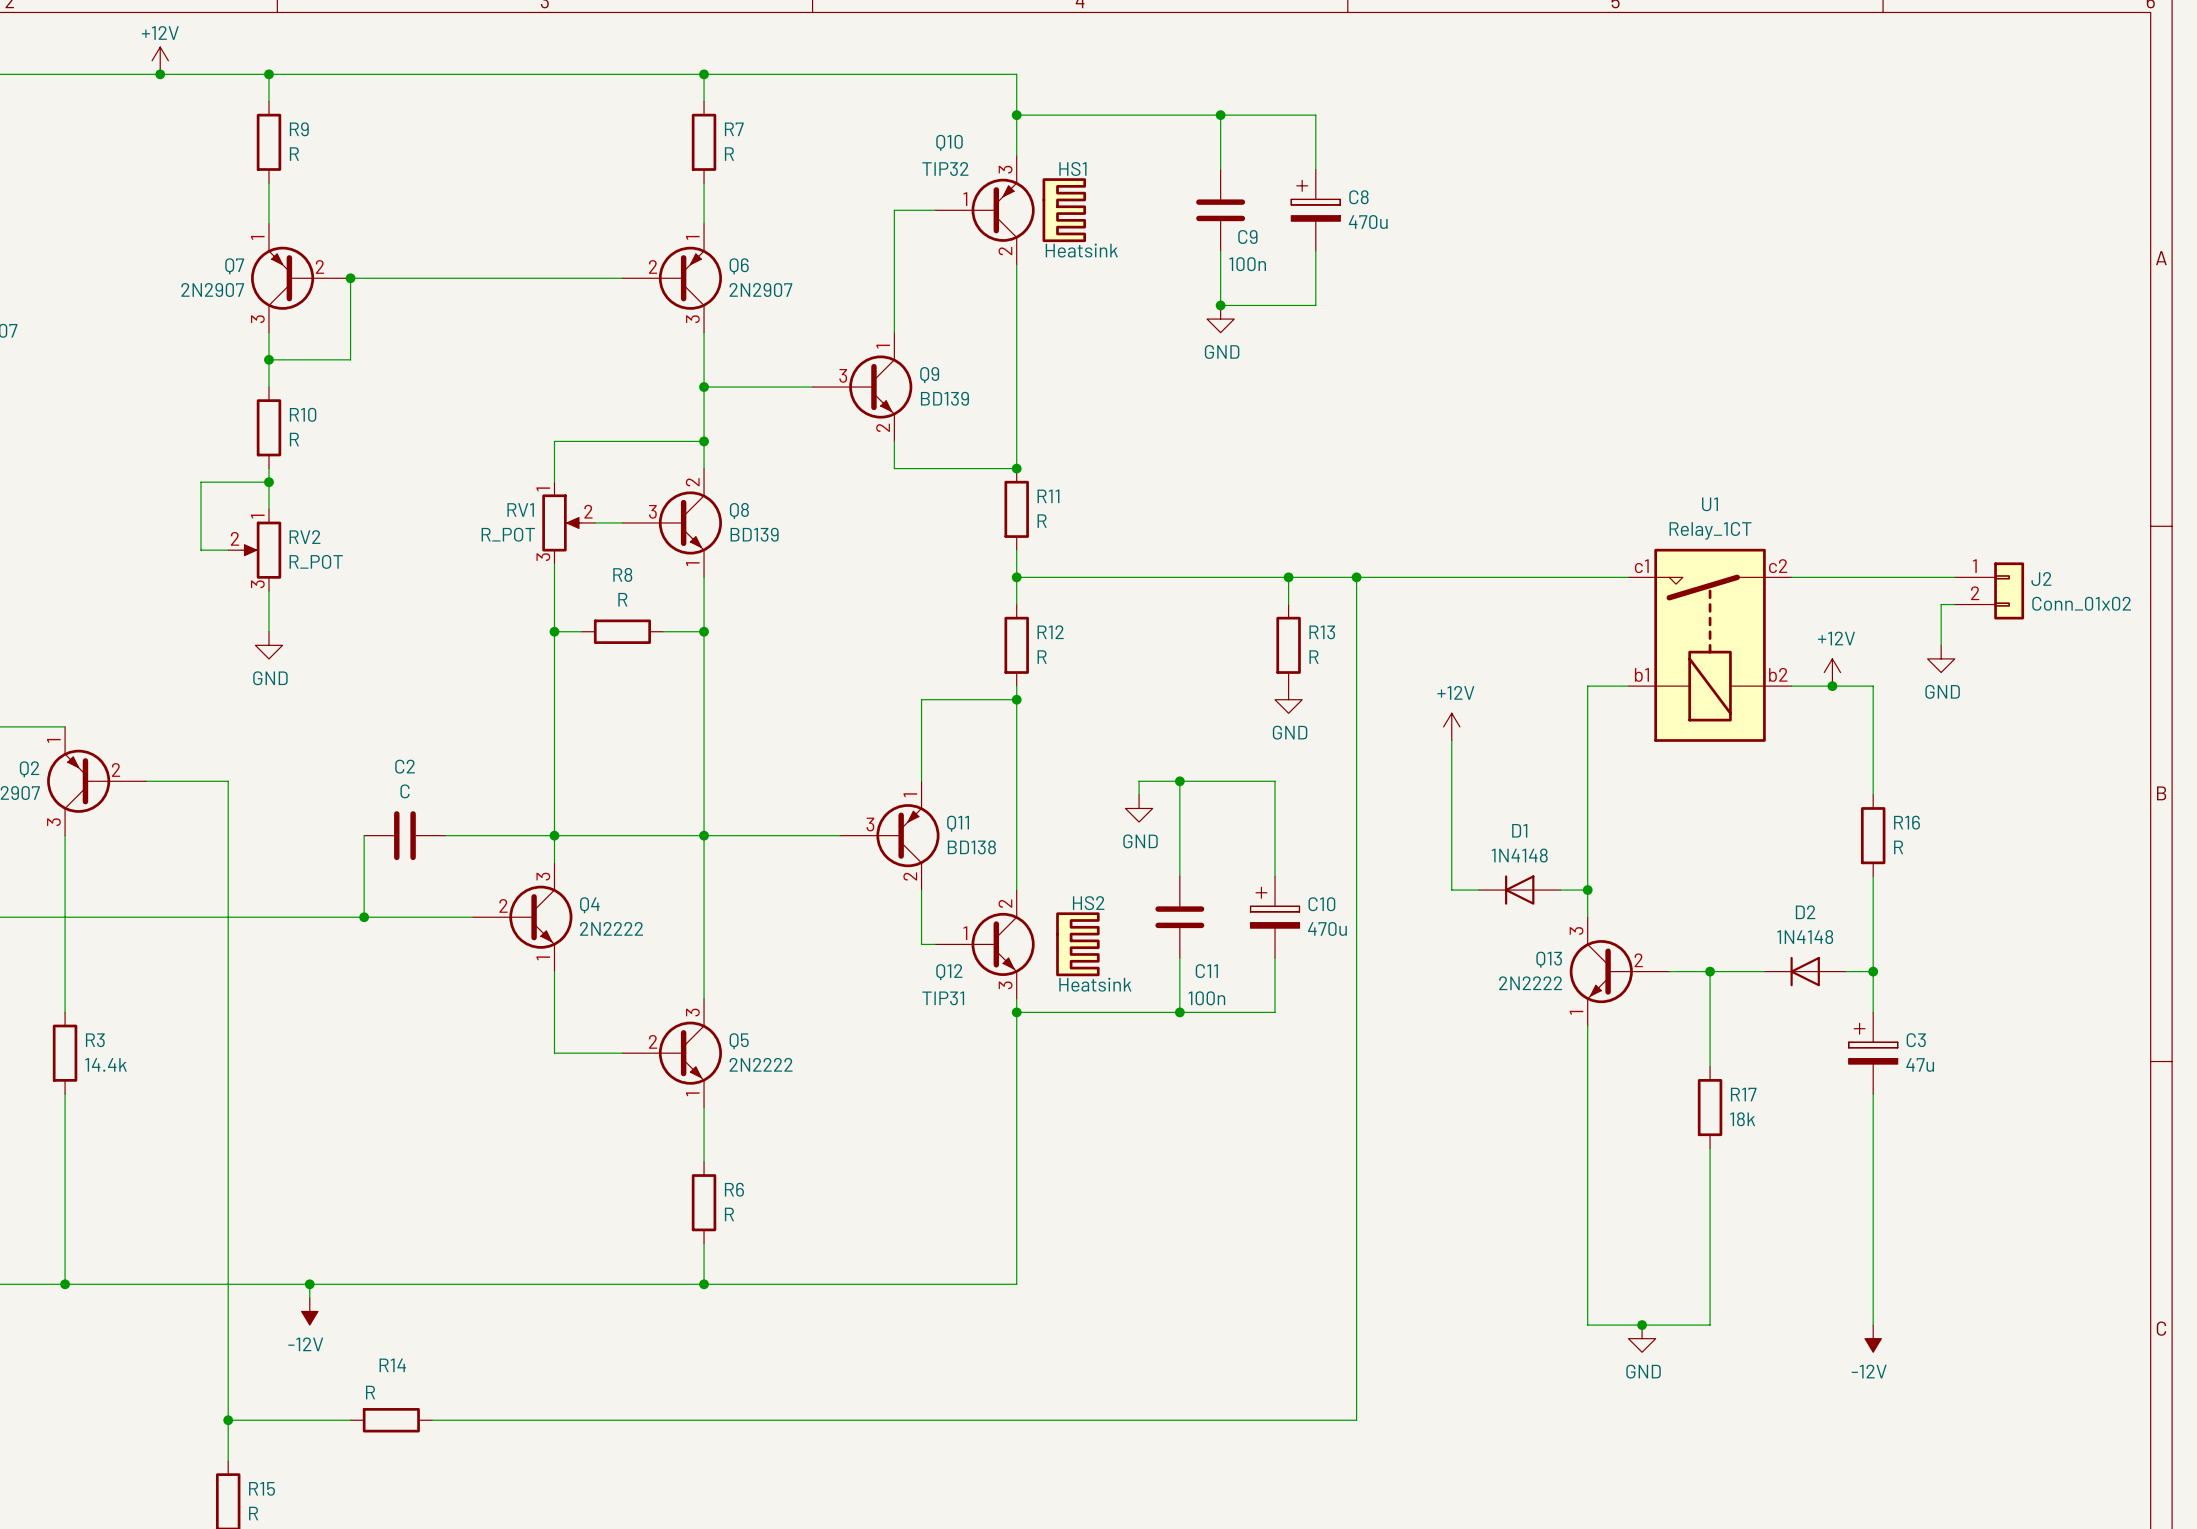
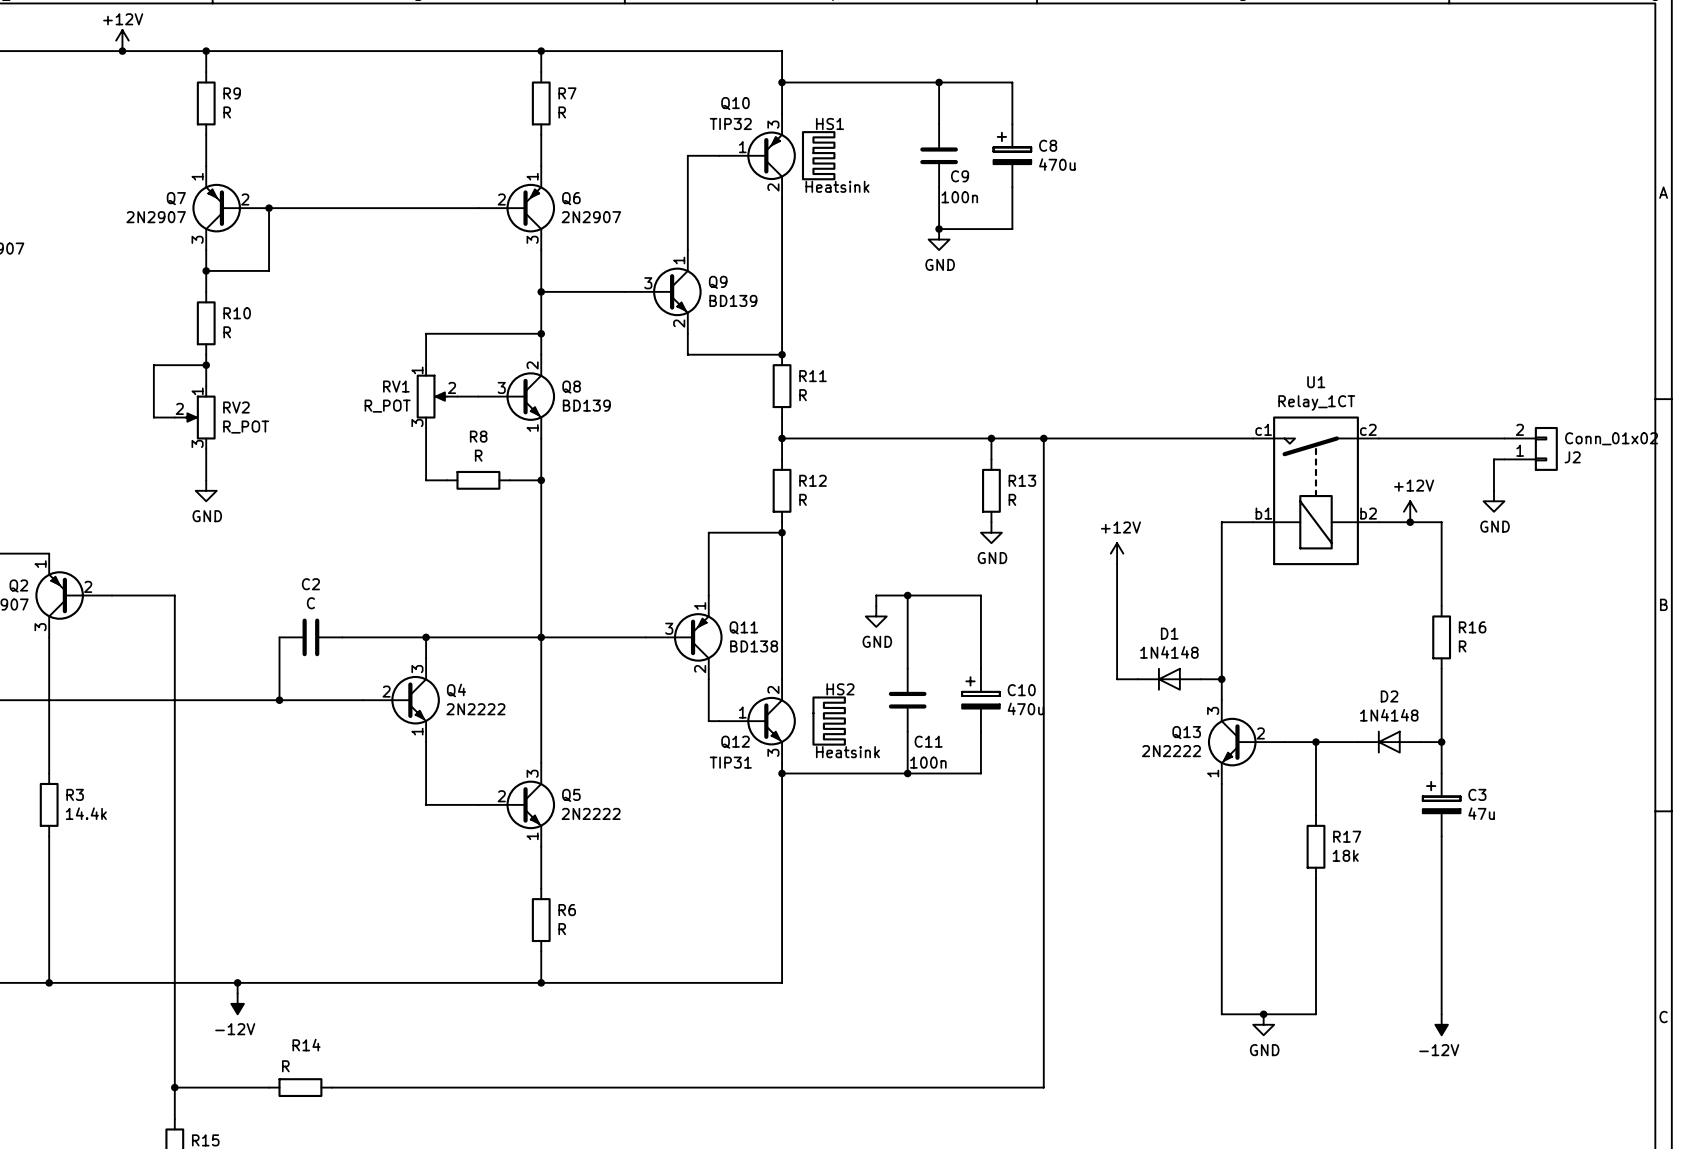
J2 flip: as is (2009, 590) -> up-down (1546, 448)
wire: (554, 631) (554, 835) -> none
junction: (554, 631) -> none

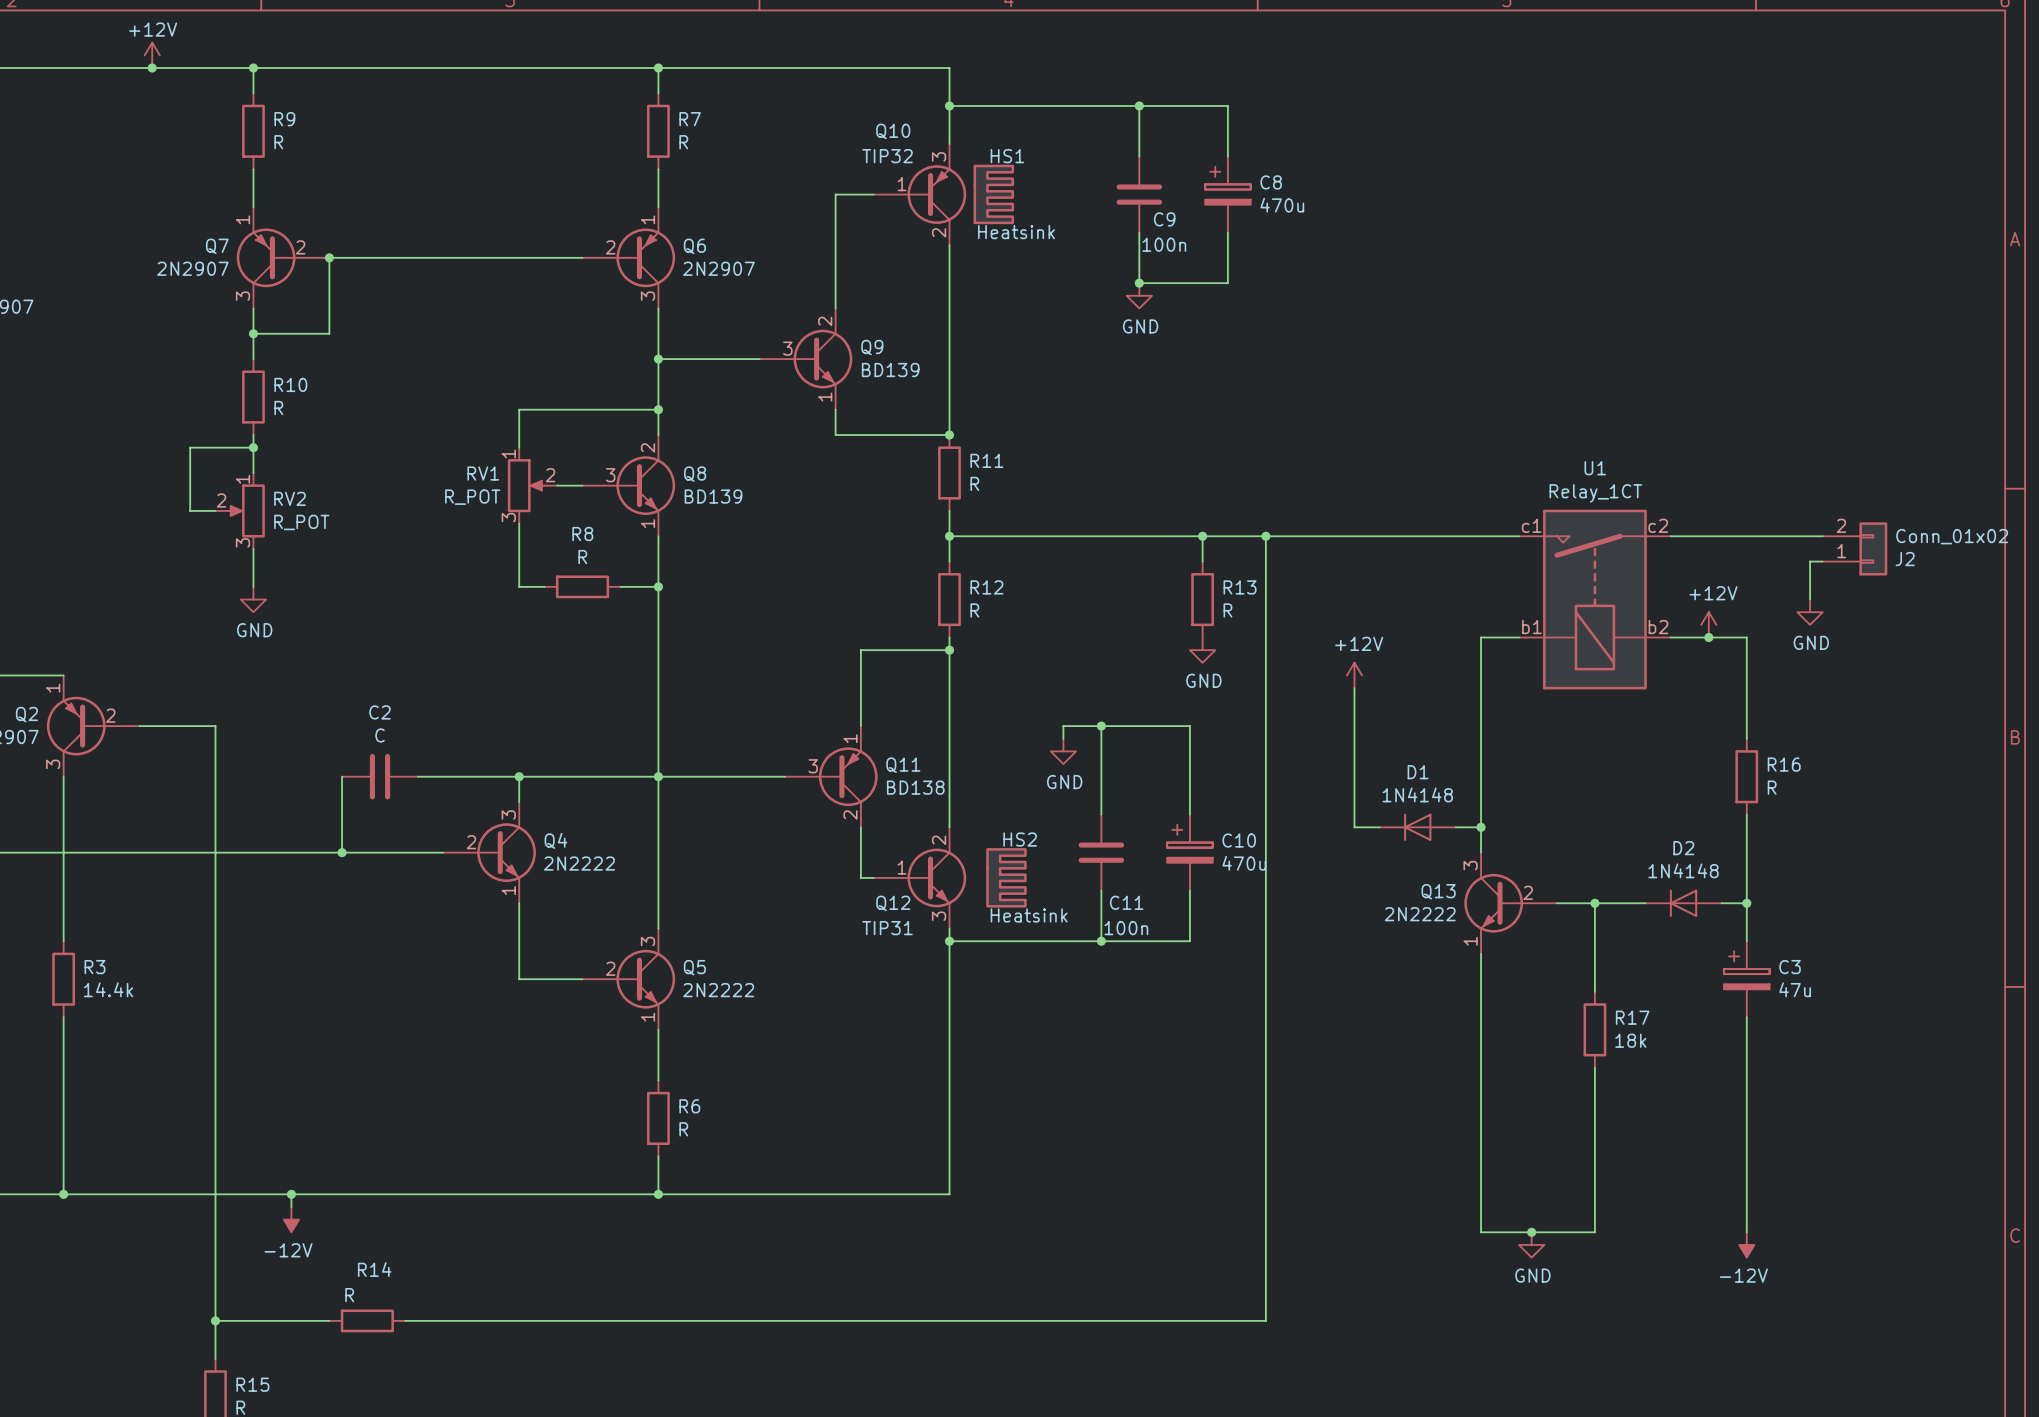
Q9 pin number: 1 (679, 260) -> 2 (825, 321)
Q9 pin number: 2 (679, 323) -> 1 (825, 397)

